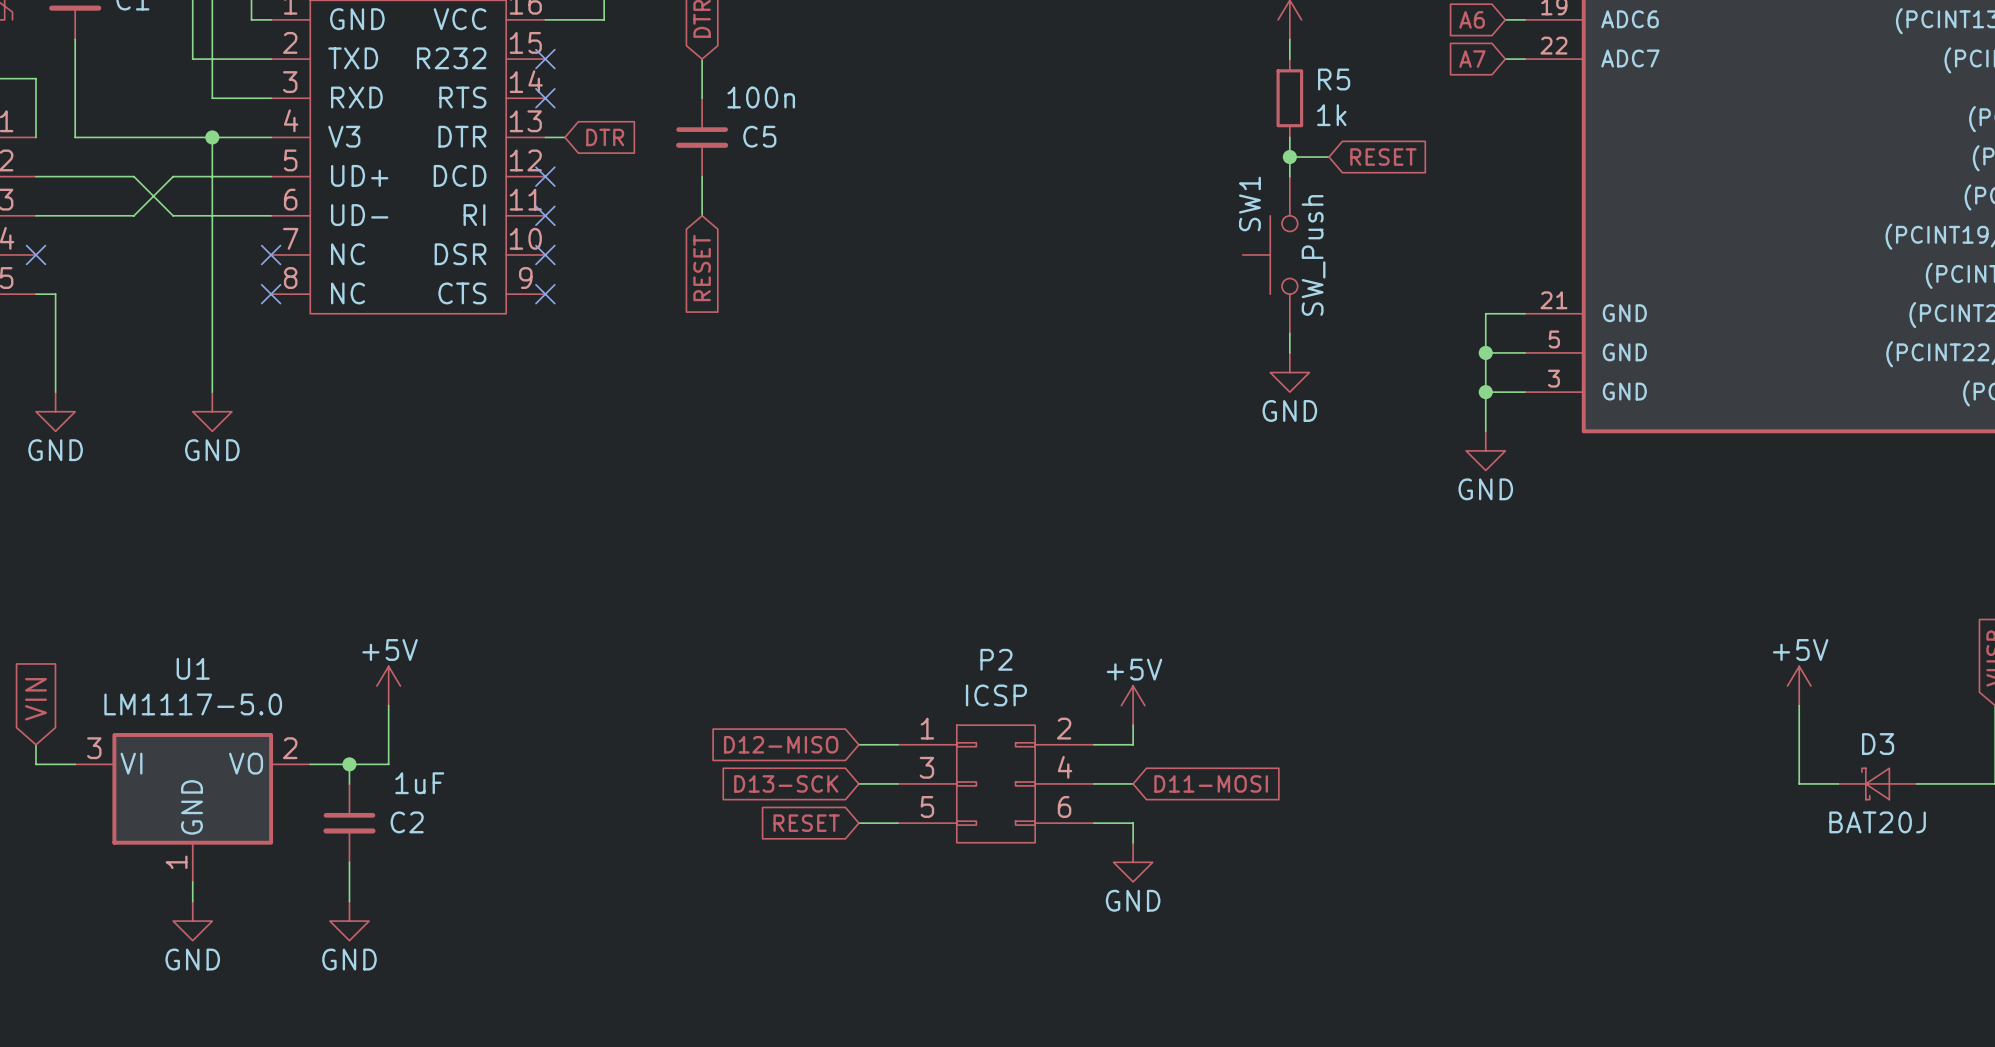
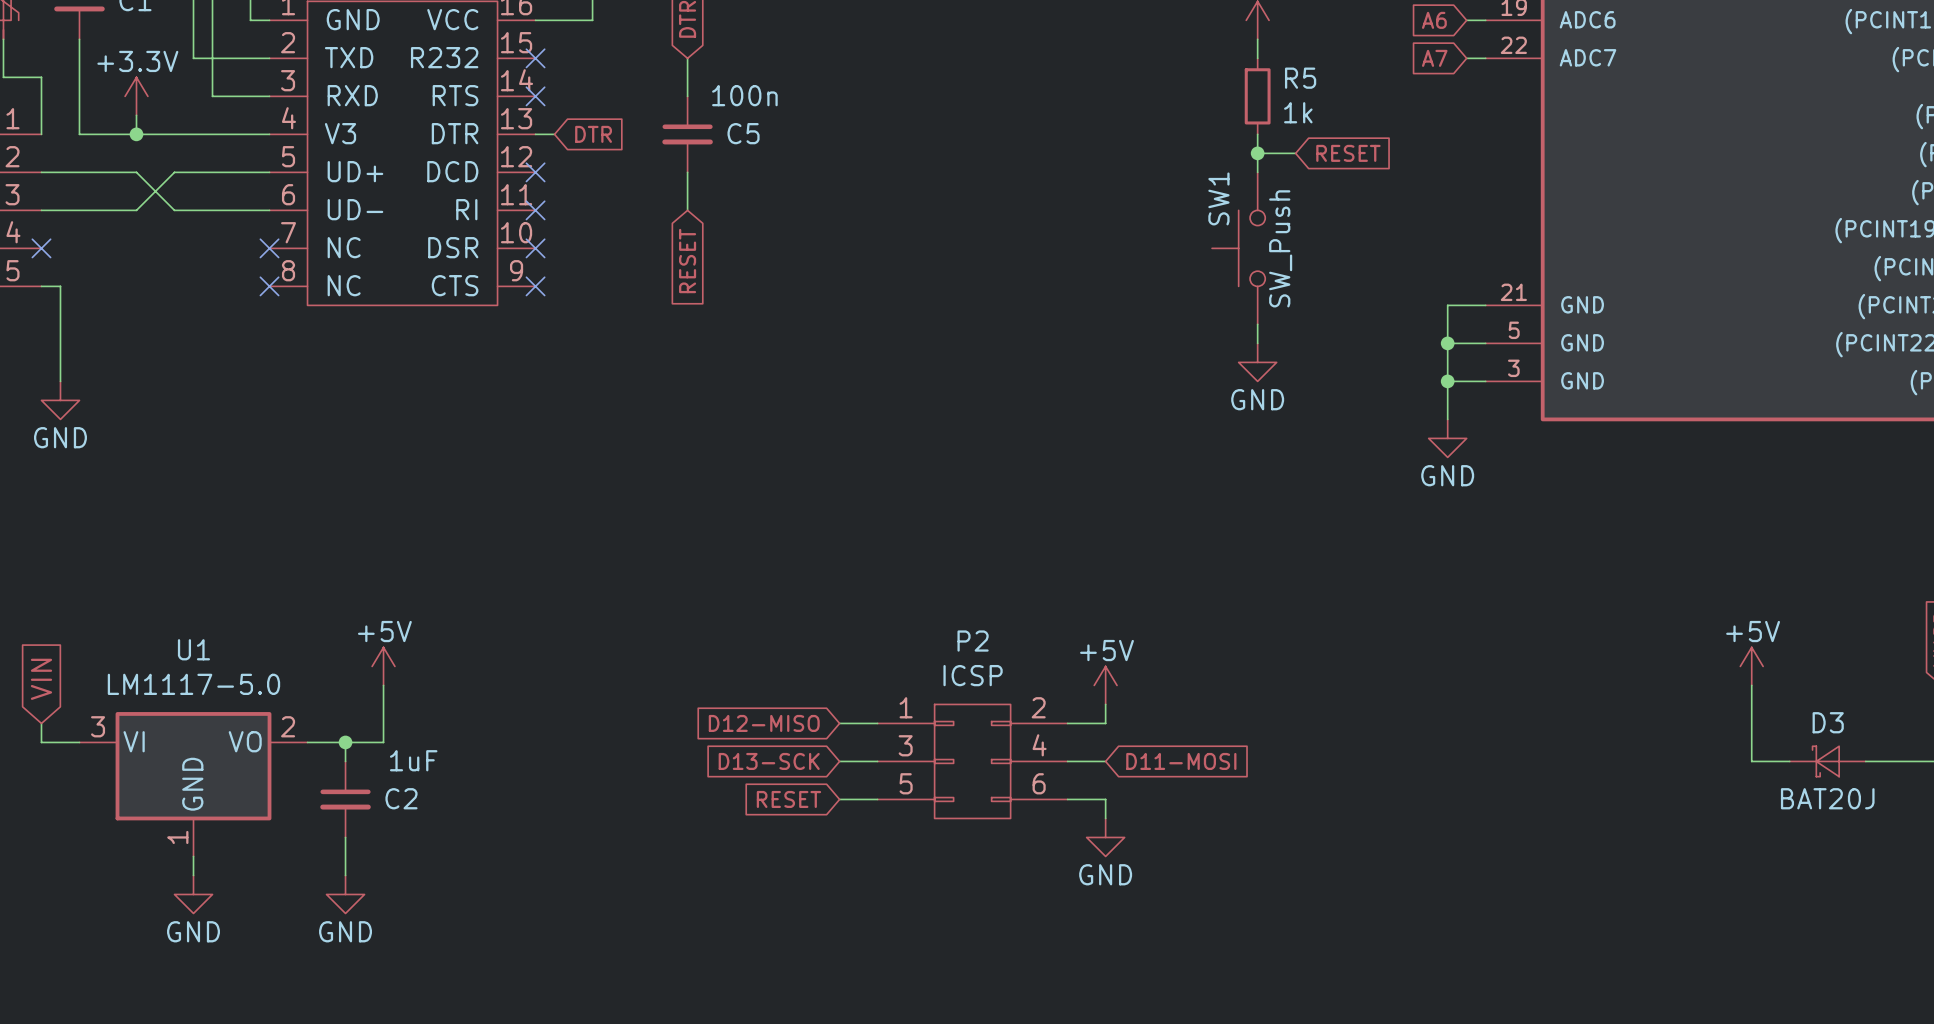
power symbol: none -> +3.3V (136, 96)
wire: none -> (136, 115) (136, 134)
wire: (212, 137) (212, 392) -> none
junction position: (212, 137) -> (136, 134)
power symbol: GND (212, 411) -> none

